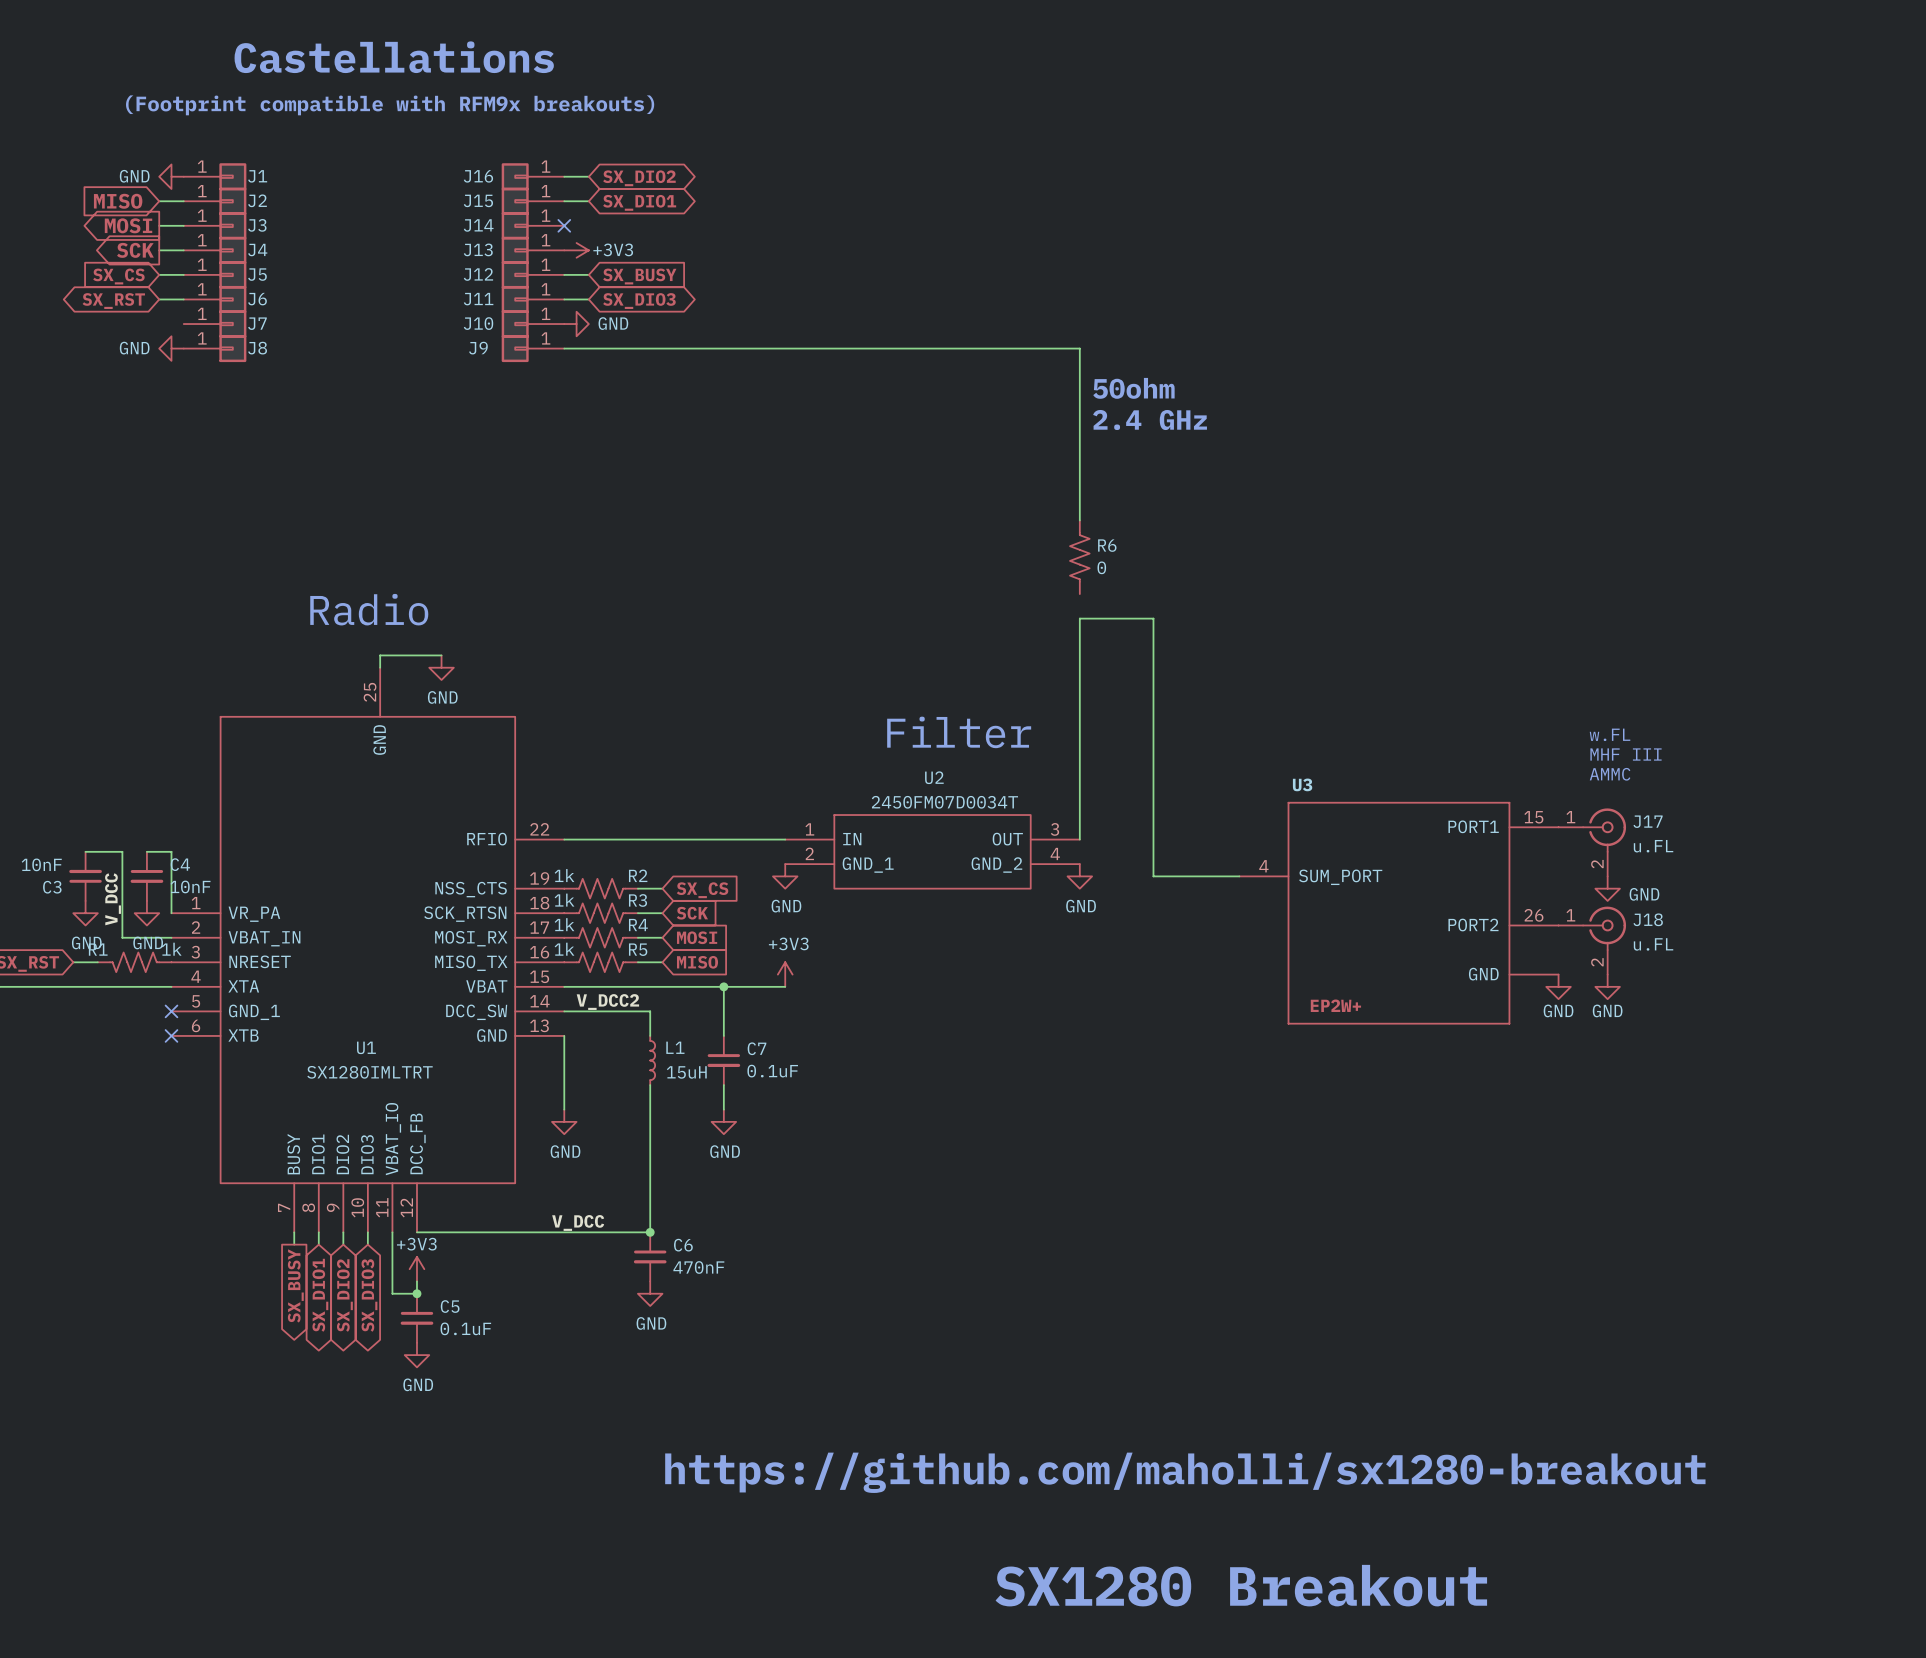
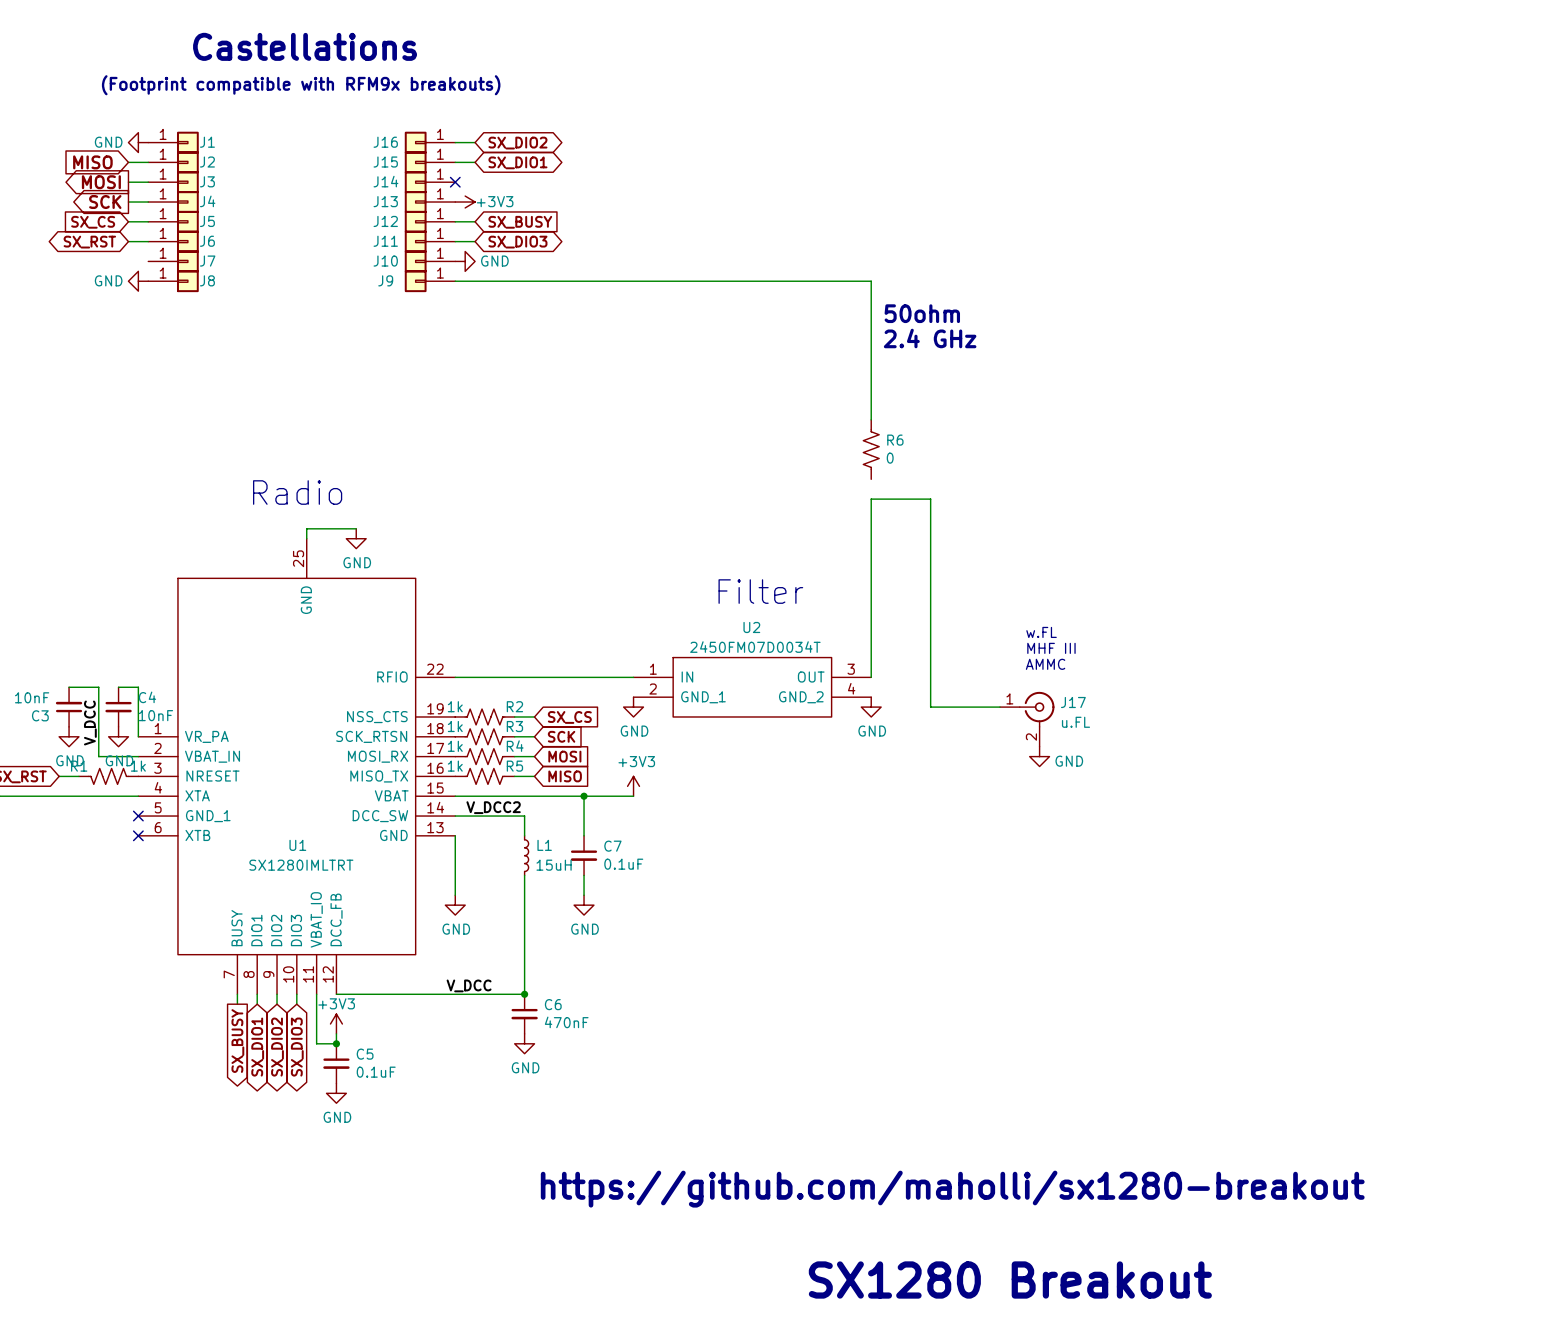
text: w.FL (1610, 734) -> none
text: MHF III (1626, 754) -> none
text: AMMC (1610, 774) -> none
text: none -> w.FL (1041, 632)
text: none -> MHF III (1051, 648)
text: none -> AMMC (1045, 664)
J17 position: (1592, 842) -> (1027, 719)
power symbol: GND (1607, 888) -> none
U3: (1398, 913) -> none
power symbol: none -> GND (1039, 756)
J18: u.FL (1592, 940) -> none
power symbol: GND (1558, 986) -> none
power symbol: GND (1607, 986) -> none

